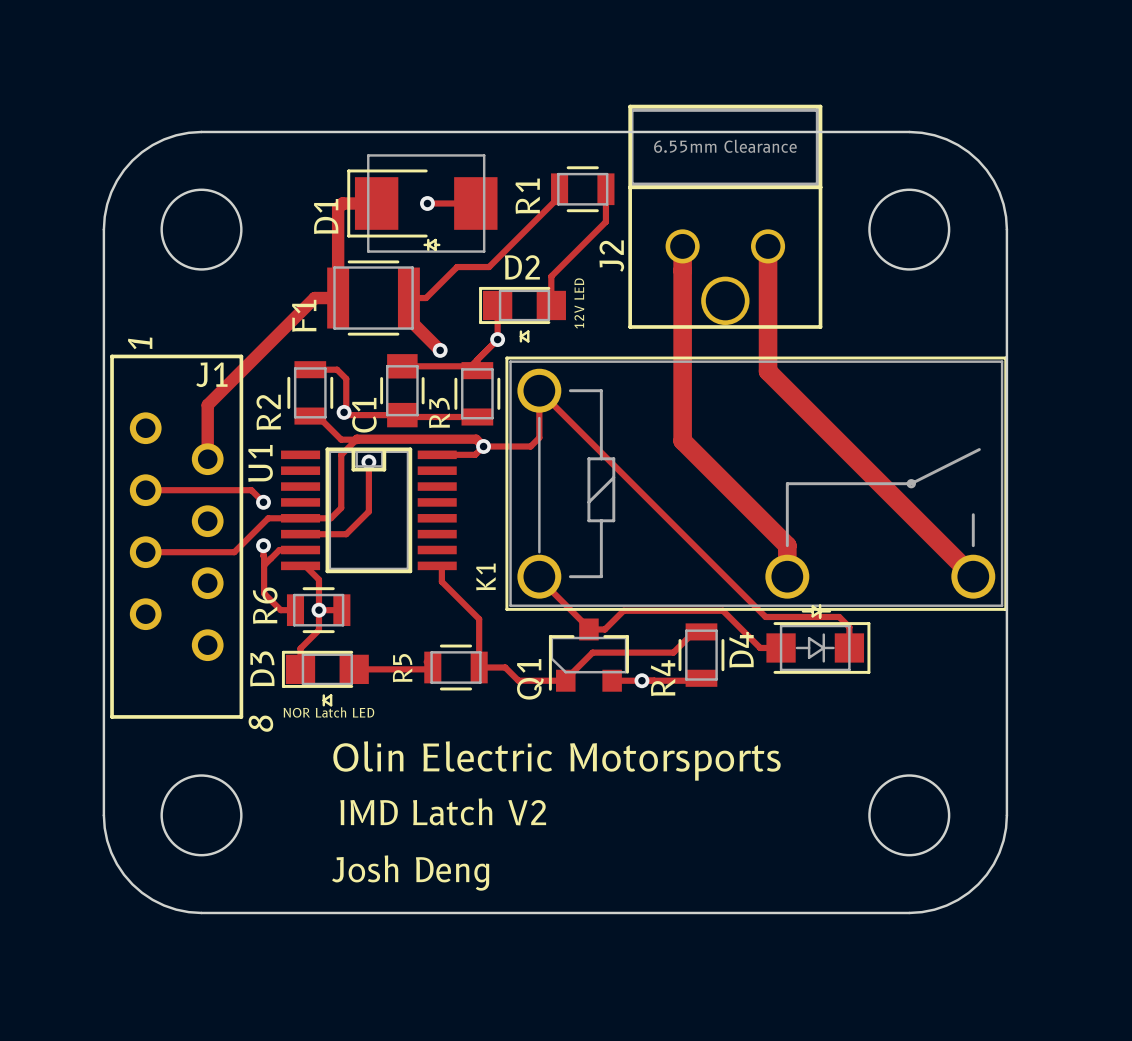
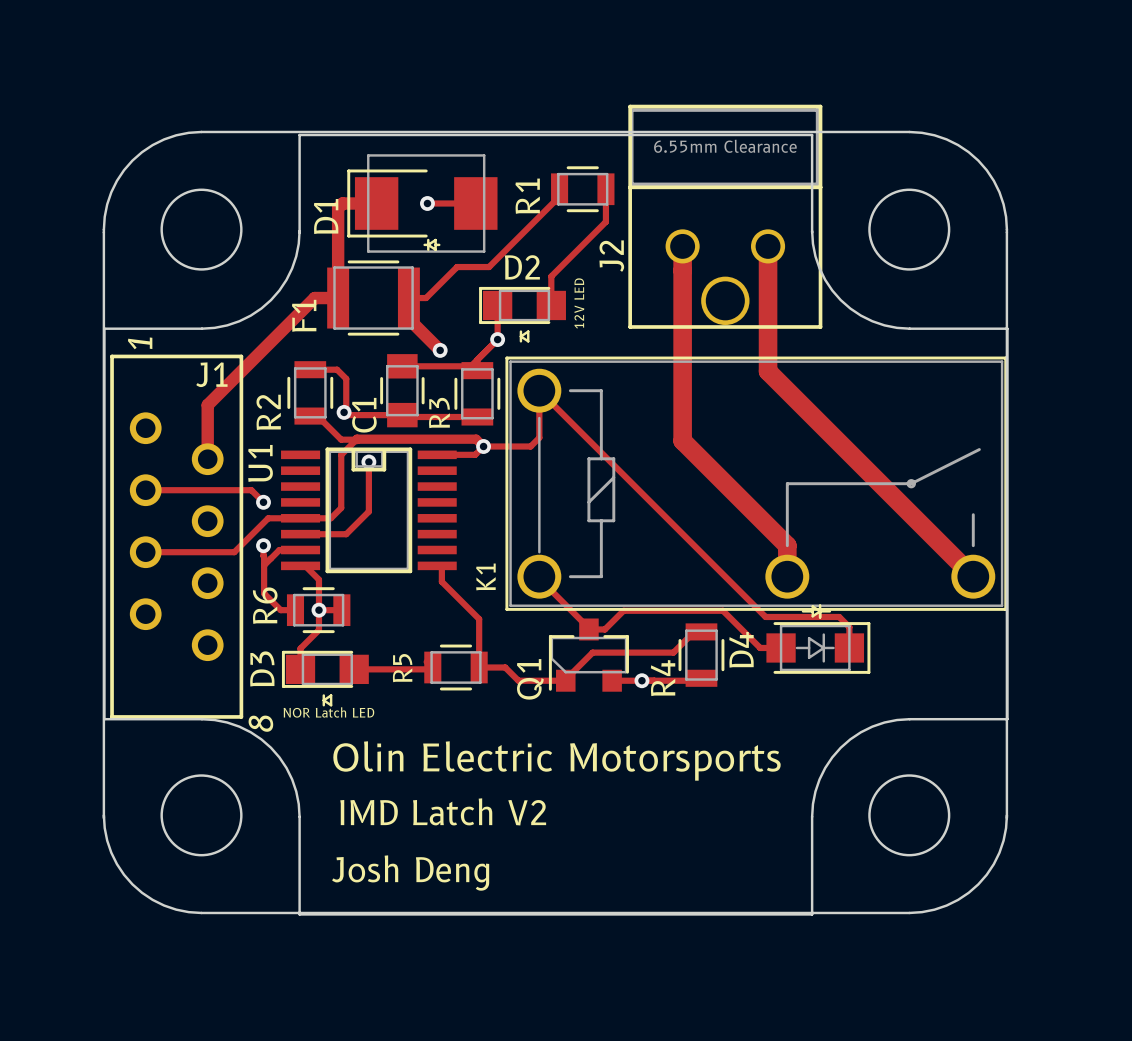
board edge: none -> (299, 231) (296, 256) (286, 279) (271, 300) (250, 315) (227, 325) (214, 327) (104, 328) (104, 719) (214, 720) (239, 726) (261, 739) (271, 747) (286, 768) (292, 779) (298, 804) (299, 914) (812, 914) (812, 804) (819, 779) (825, 768) (840, 747) (850, 739) (872, 726) (897, 720) (1007, 719) (1007, 328) (897, 327) (884, 325) (860, 315) (840, 300) (825, 279) (815, 256) (812, 231)
board edge: none -> (299, 232) (299, 134) (812, 134) (812, 232)

